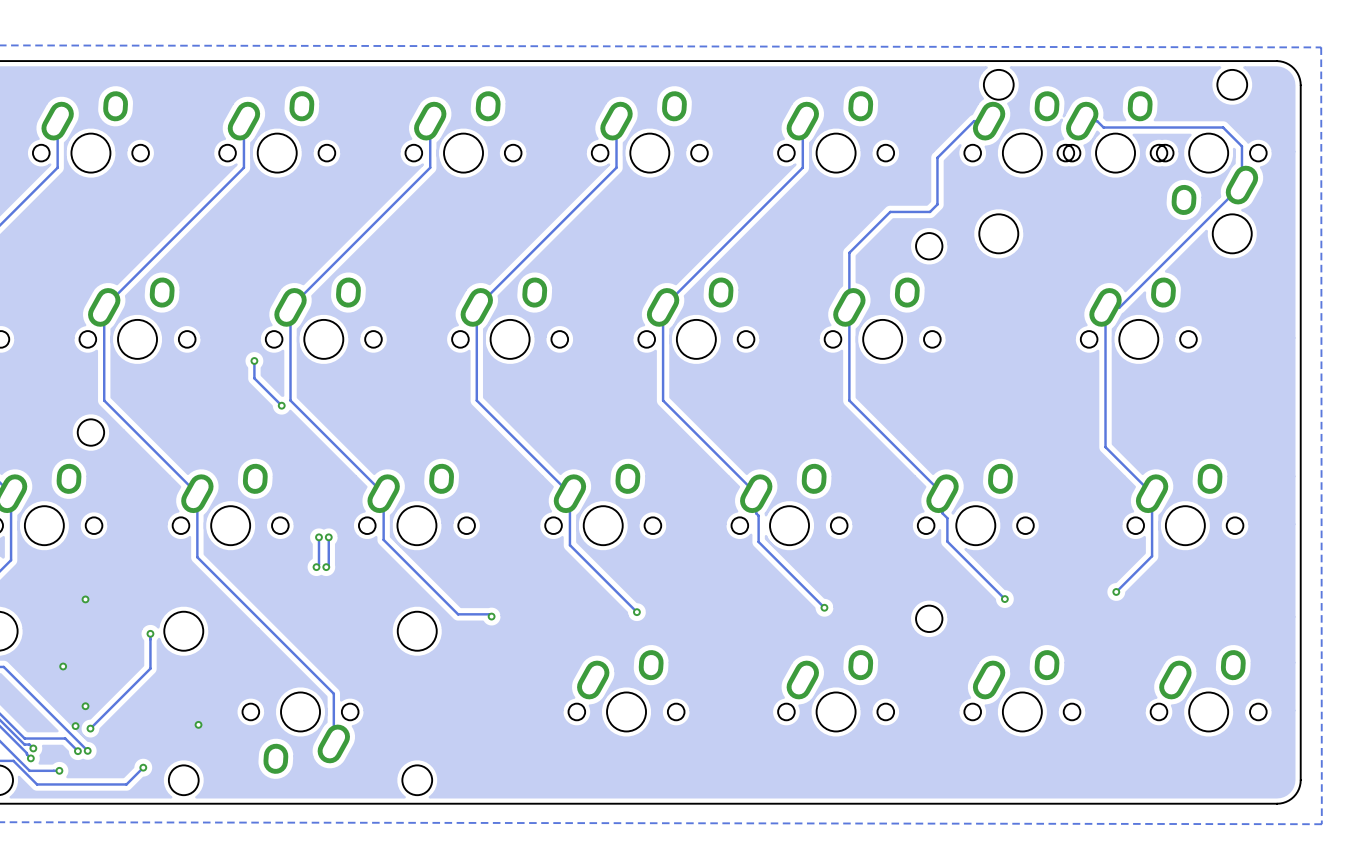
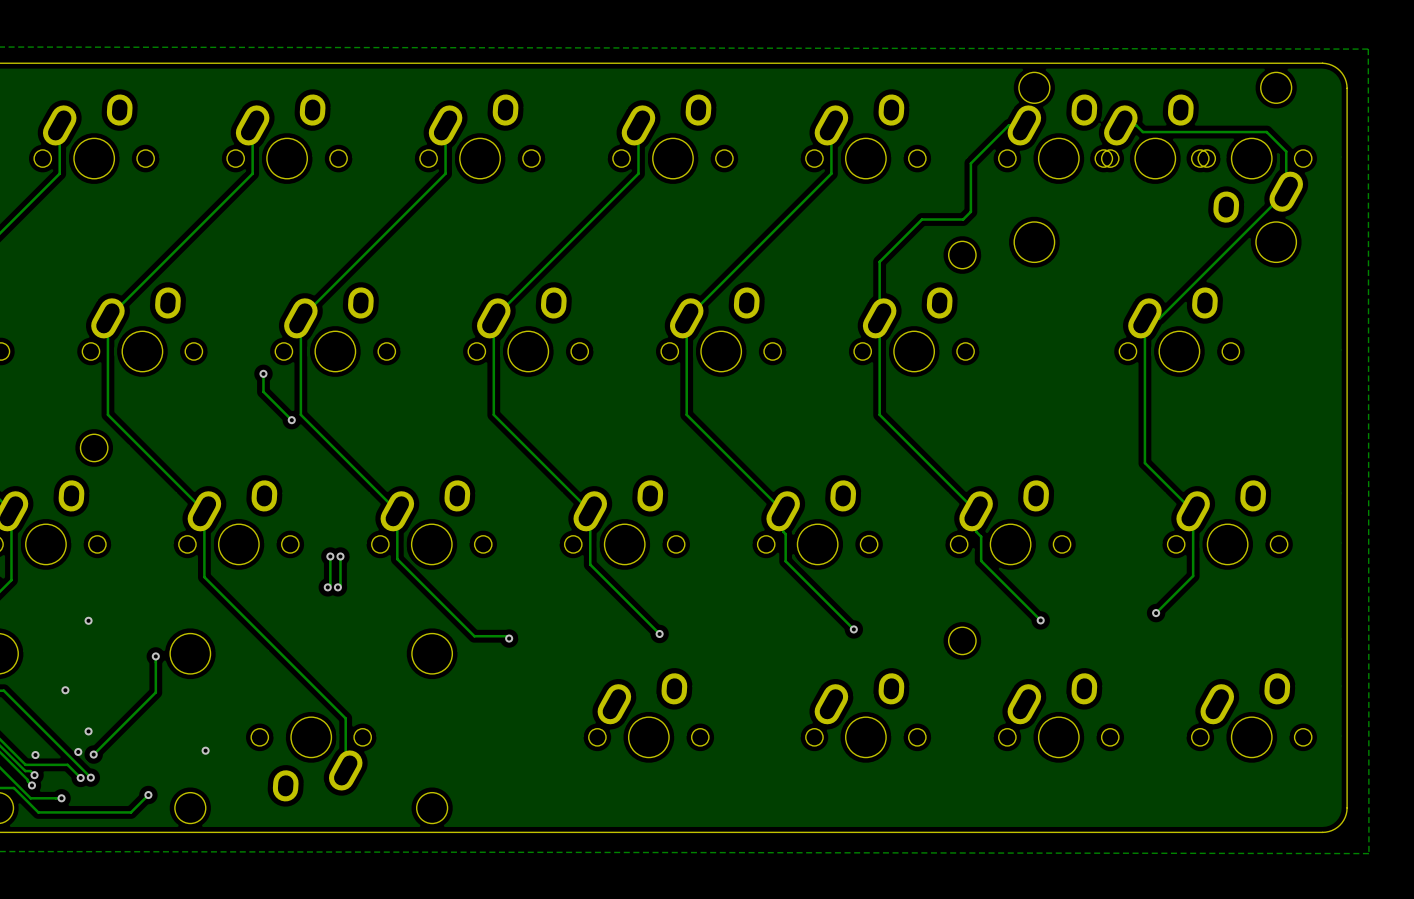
via: none -> (35, 755)

